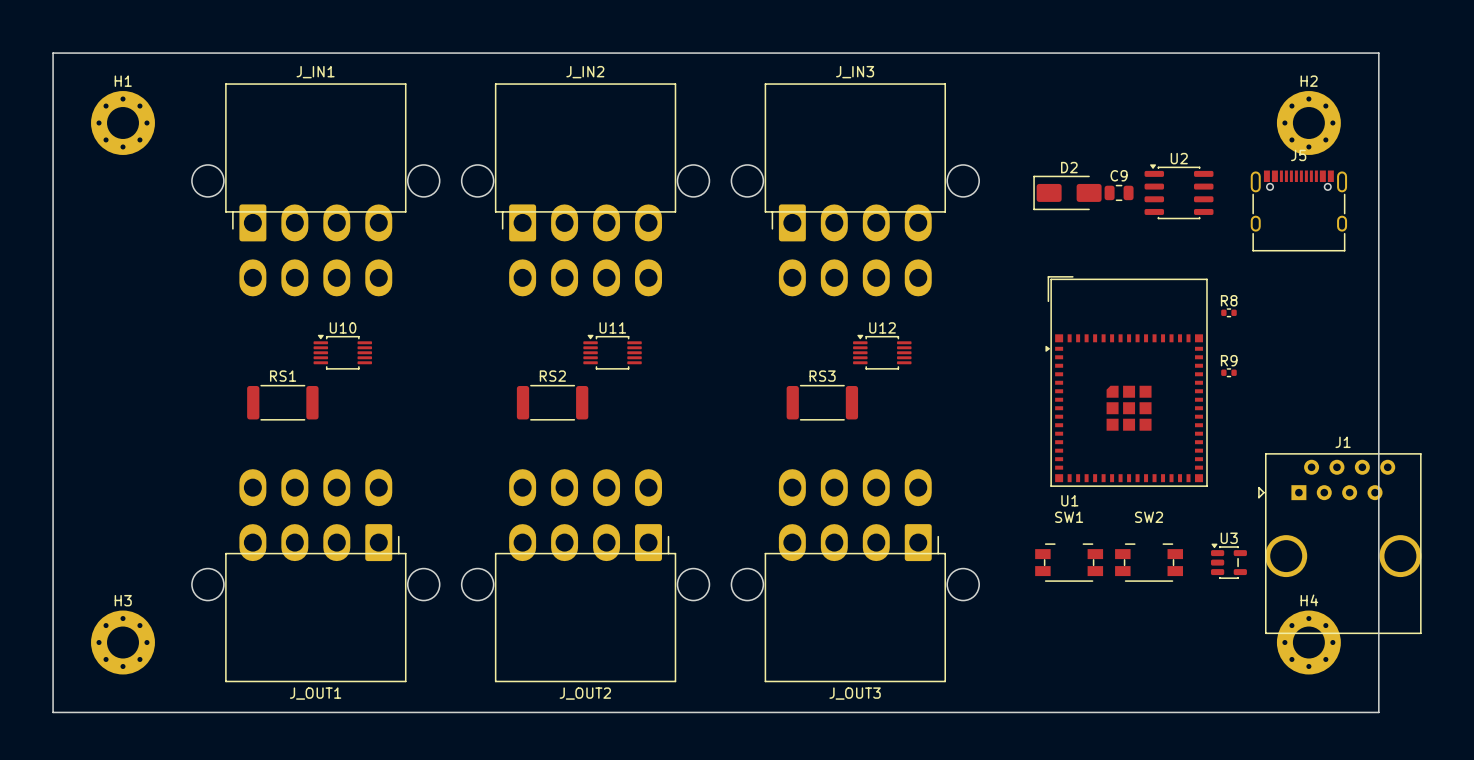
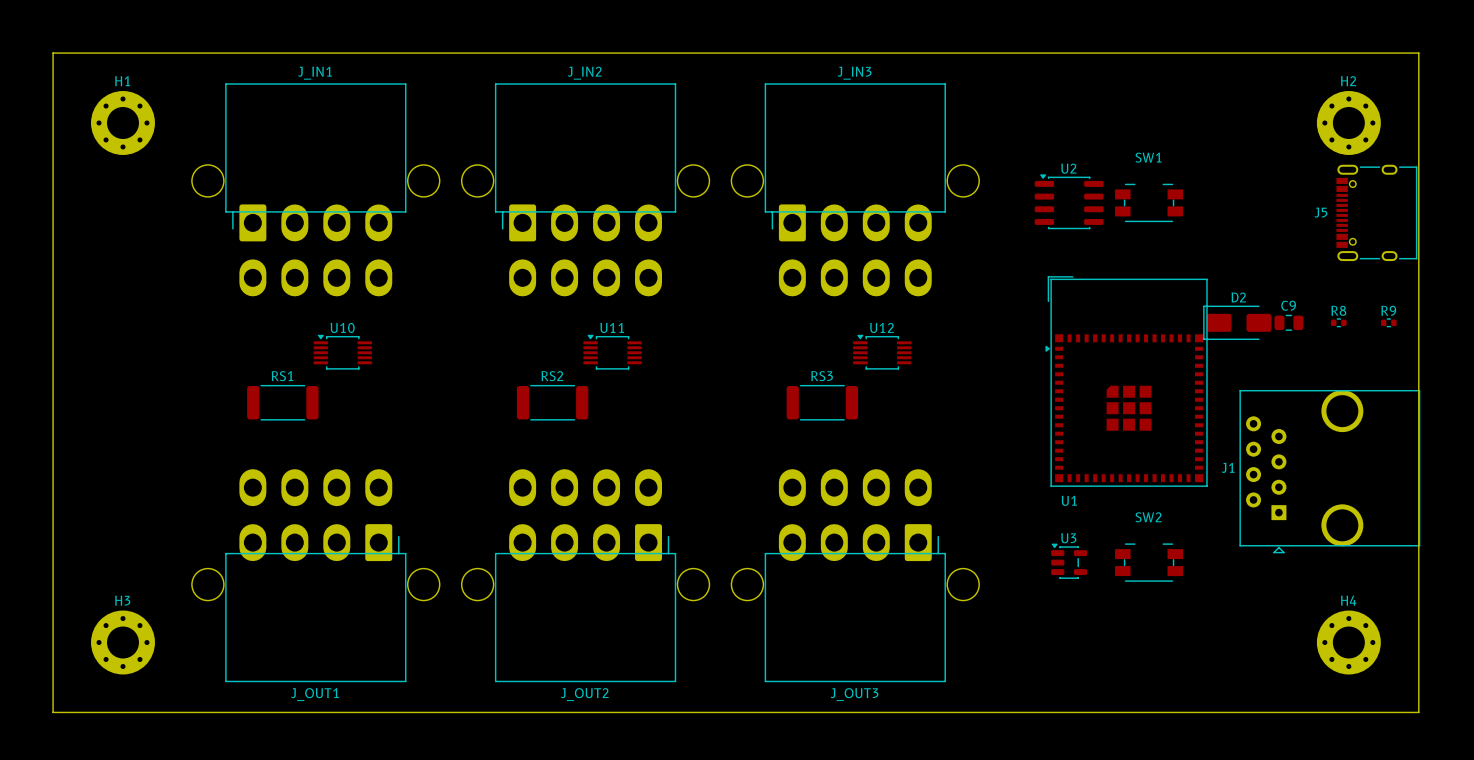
board edge: (1378, 53) (1378, 712) -> (1378, 53) (1418, 53) (1418, 712) (1378, 712)
H2 position: (1308, 122) -> (1348, 122)
U2 position: (1179, 191) -> (1069, 201)
D2 position: (1067, 192) -> (1237, 322)
C9 position: (1119, 192) -> (1288, 322)
J5 rotation: 0° (1298, 210) -> 90° counterclockwise (1376, 212)
J5 position: (1298, 210) -> (1376, 212)
R8 position: (1228, 312) -> (1338, 322)
R9 position: (1228, 372) -> (1388, 322)
J1 rotation: 0° (1339, 543) -> 90° counterclockwise (1329, 471)
U3 position: (1228, 561) -> (1069, 561)
SW1 position: (1069, 562) -> (1149, 202)
H4 position: (1308, 642) -> (1348, 642)

